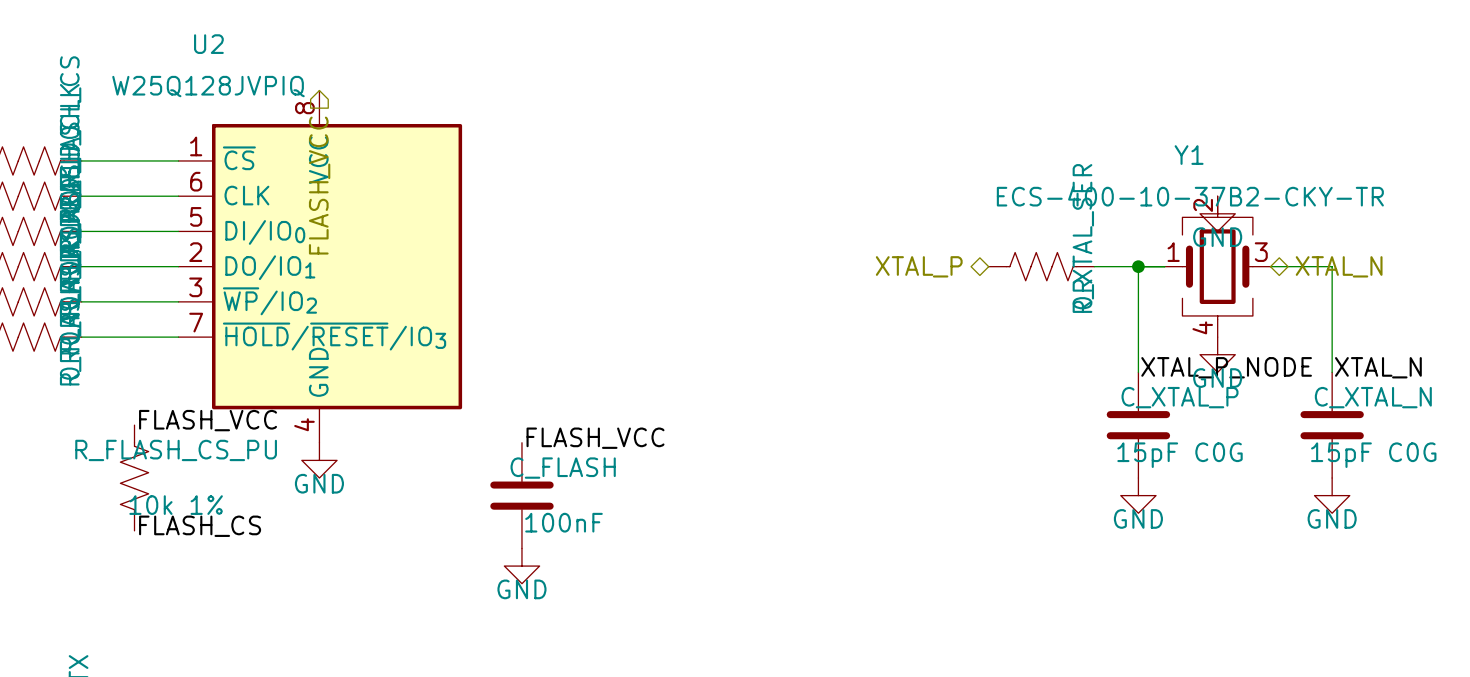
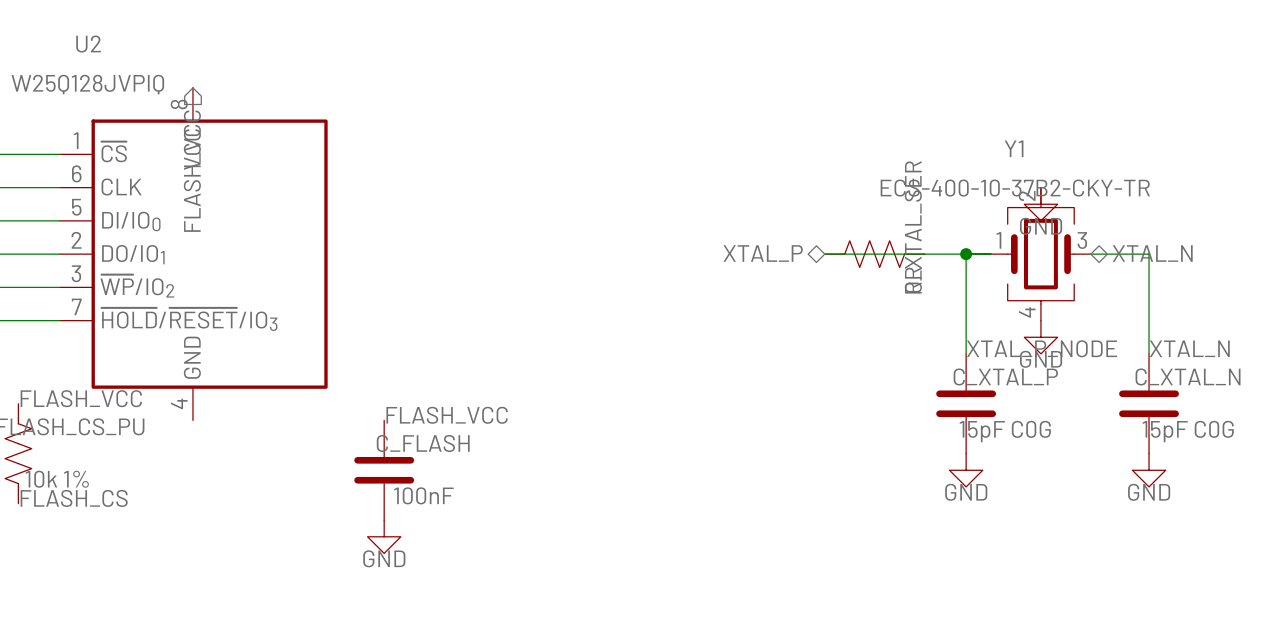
wire: none -> (824, 254) (924, 254)
power symbol: GND (319, 460) -> none

